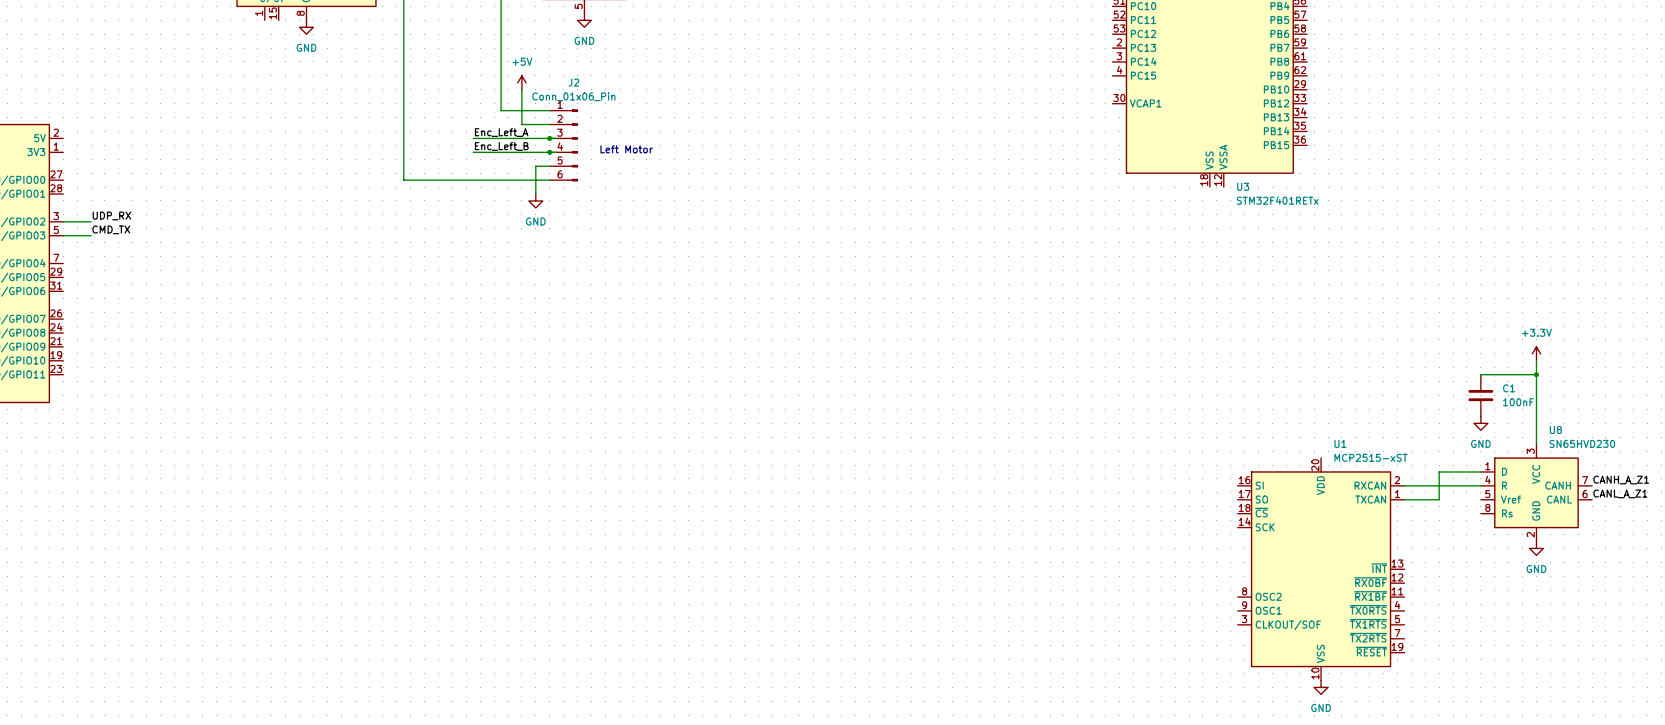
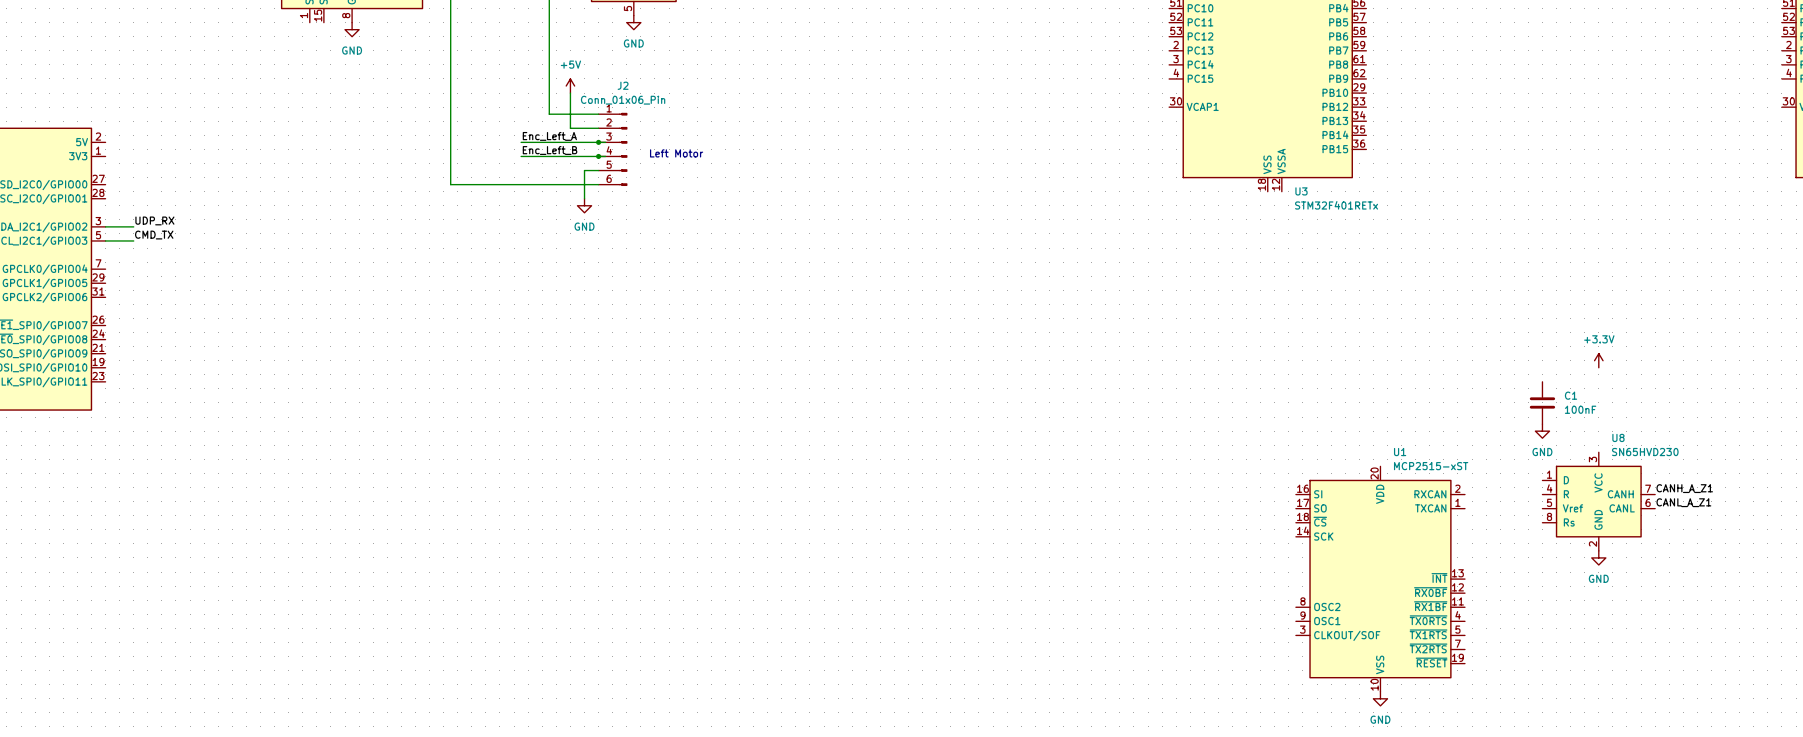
wire: (1536, 360) (1536, 444) -> none
wire: (1480, 374) (1536, 374) -> none
junction: (1536, 374) -> none
wire: (1480, 471) (1439, 471) (1439, 499) (1404, 499) -> none
wire: (1404, 485) (1480, 485) -> none

